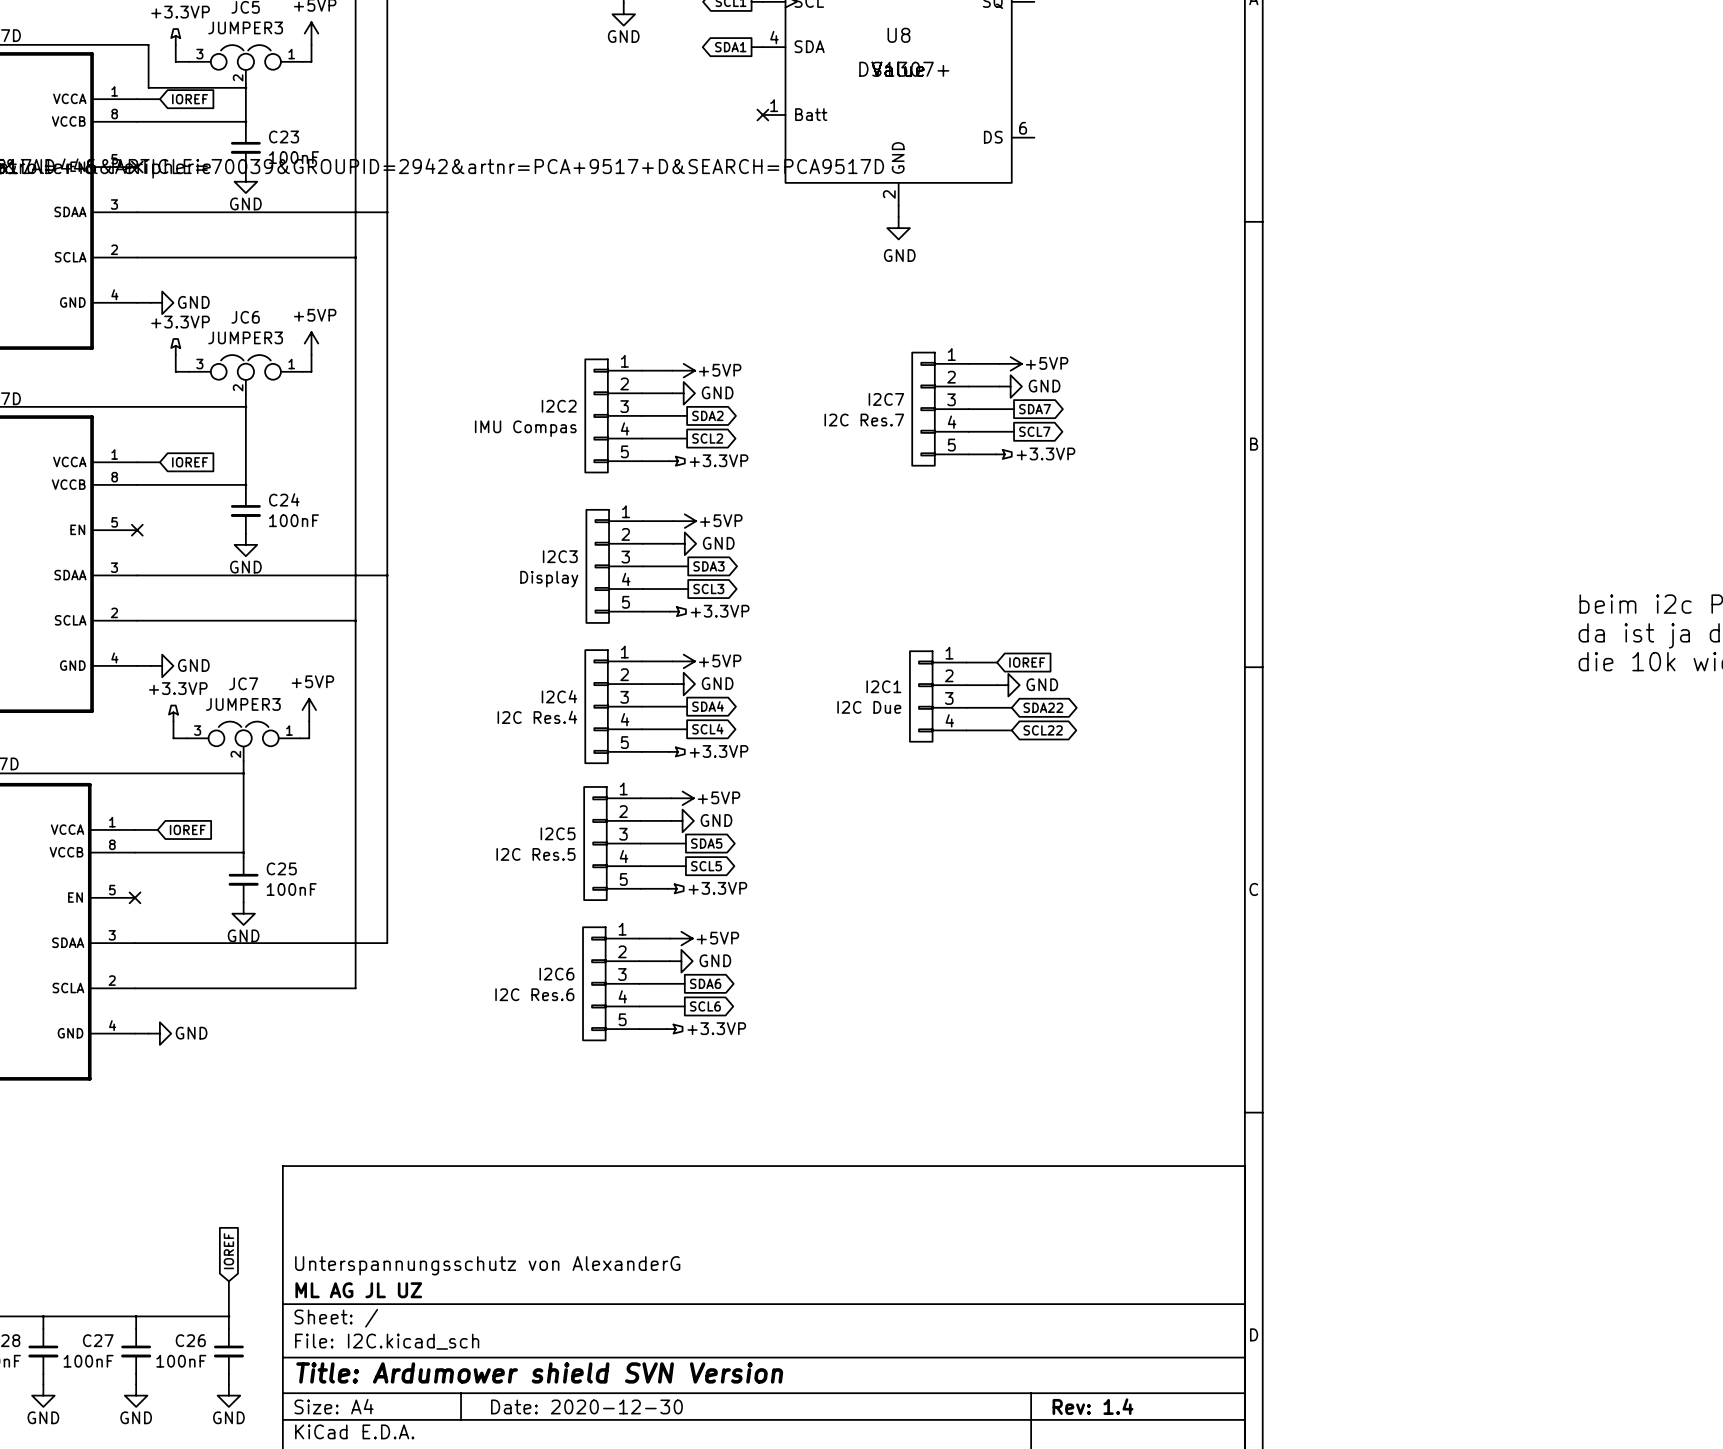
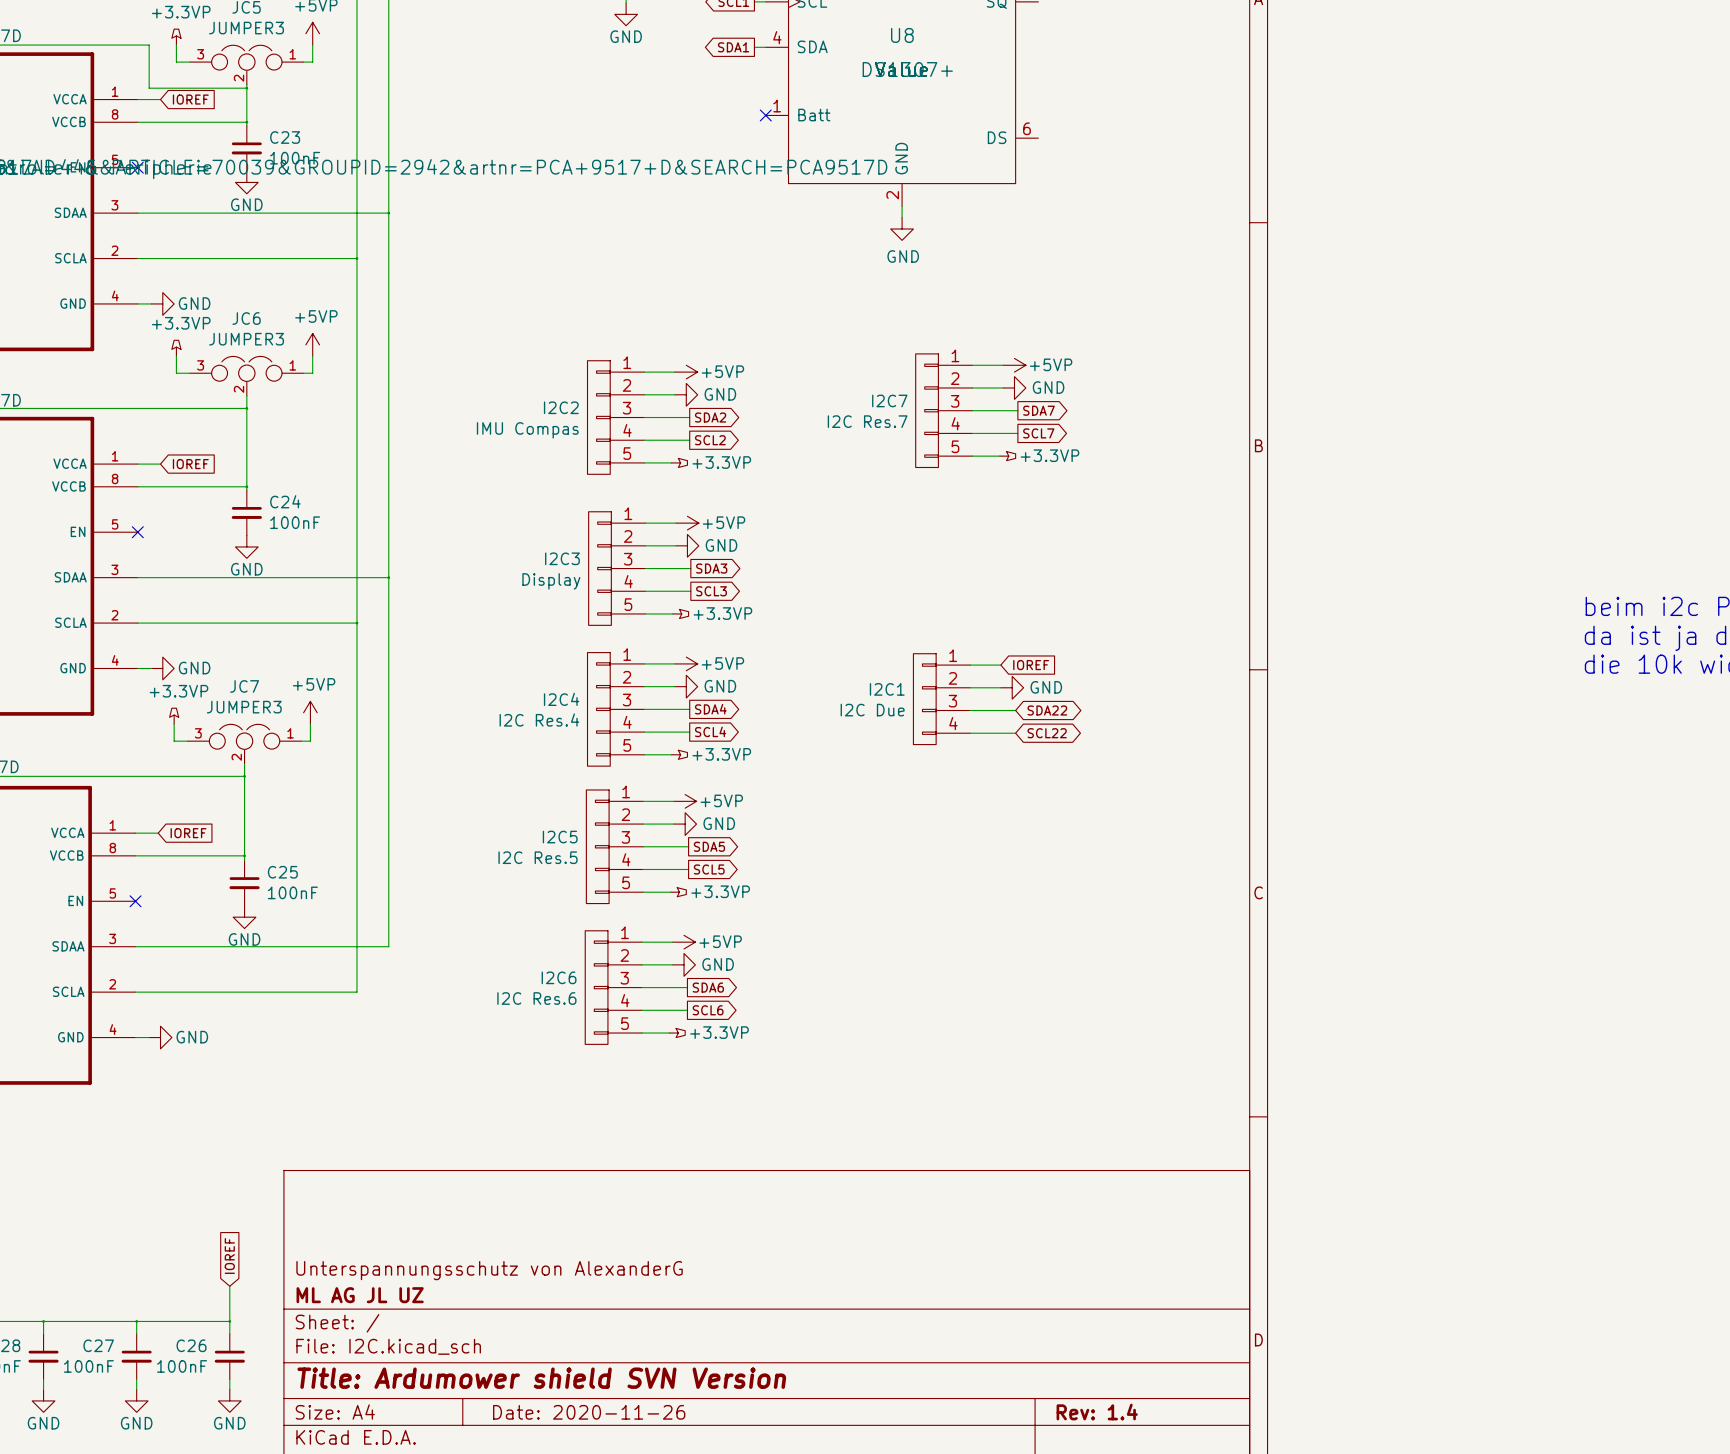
title block: Date: 2020-12-30 (586, 1406) -> Date: 2020-11-26 (589, 1412)

